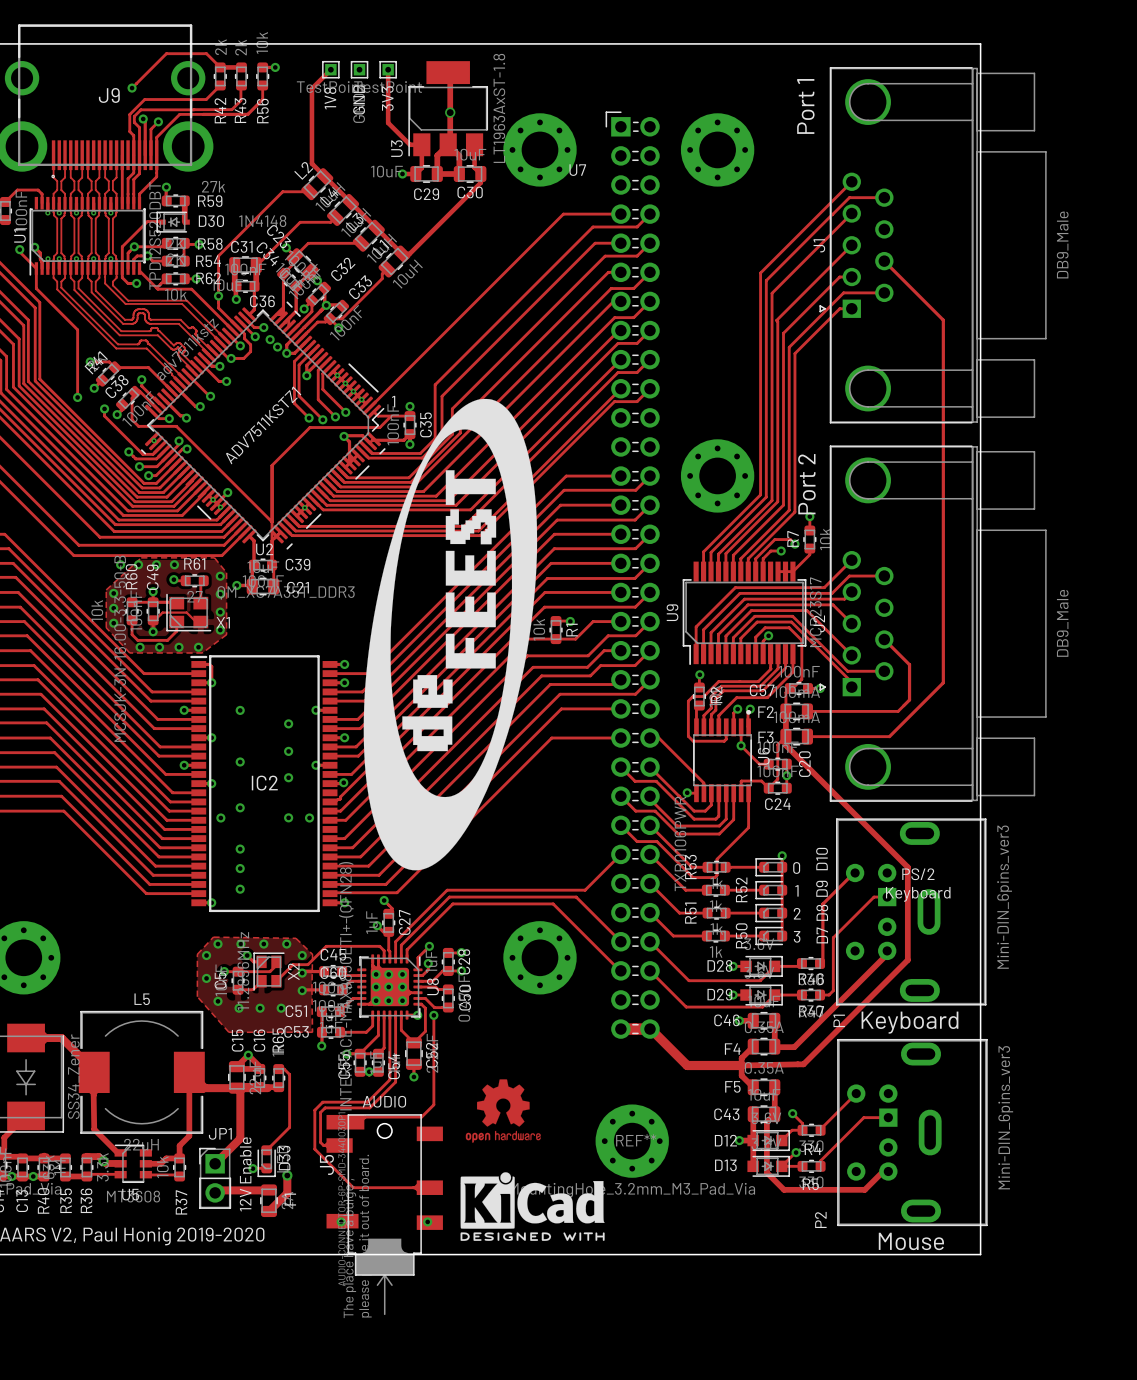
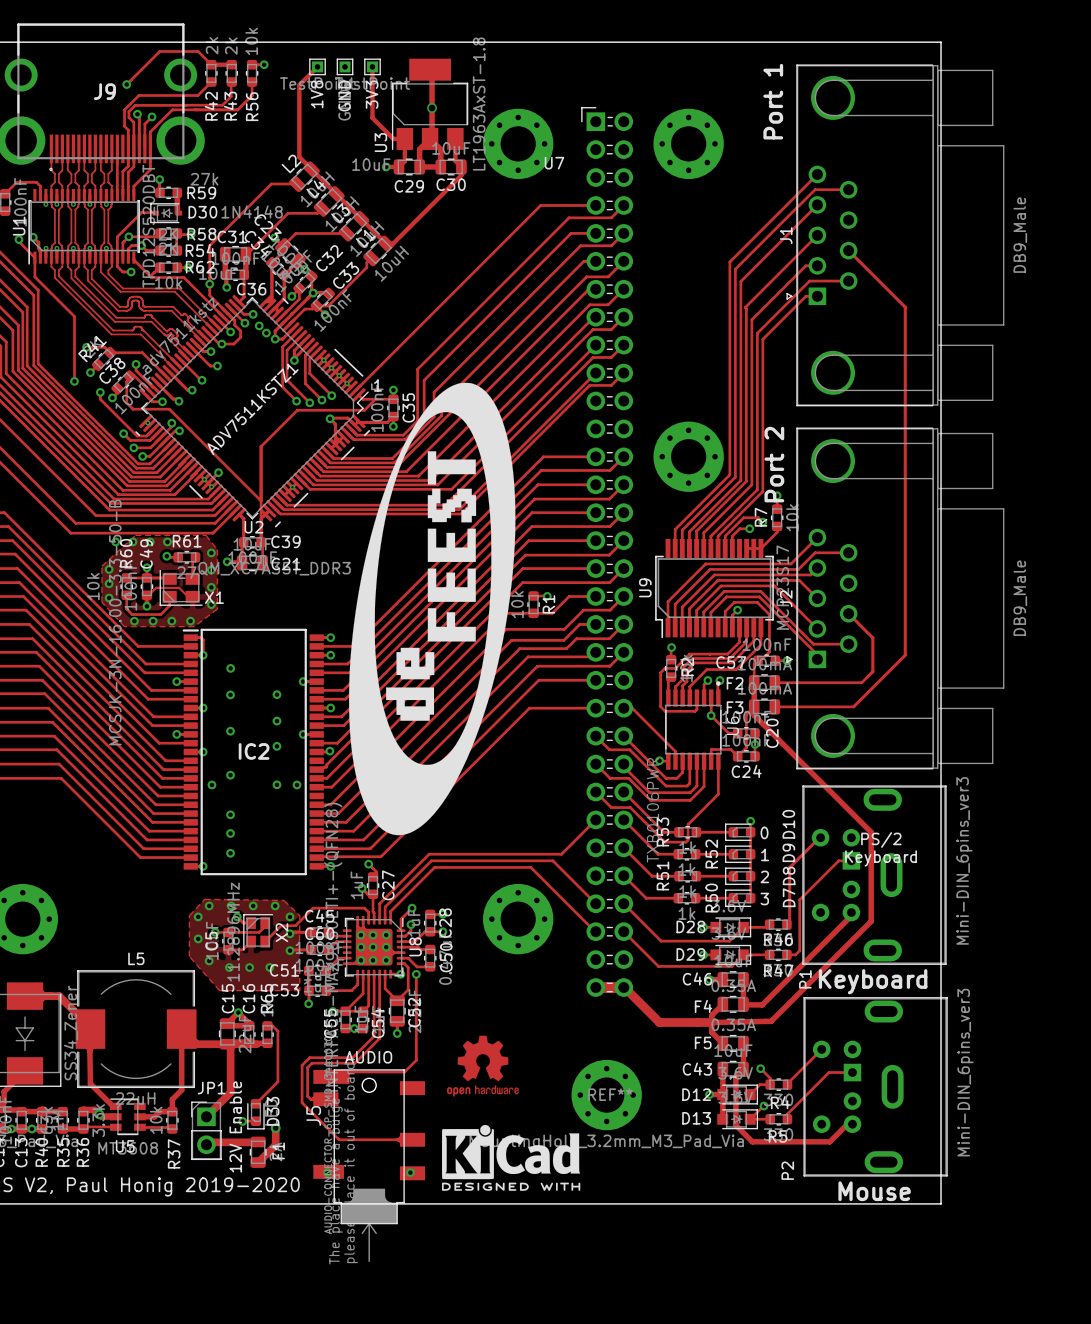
via: none -> (230, 668)
via: (240, 710) -> none
via: none -> (230, 694)

